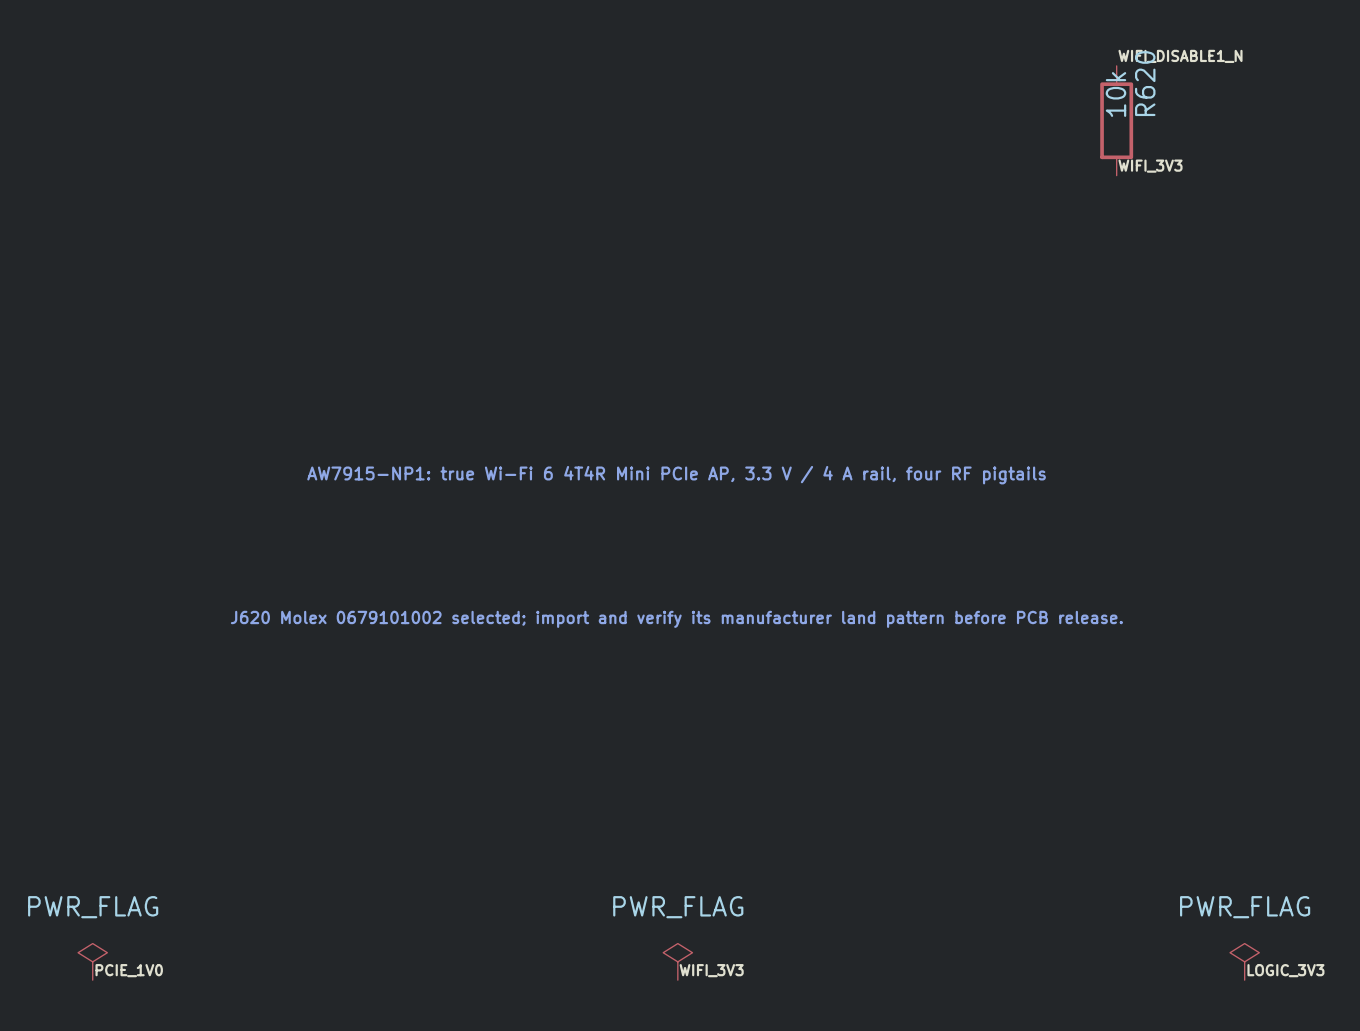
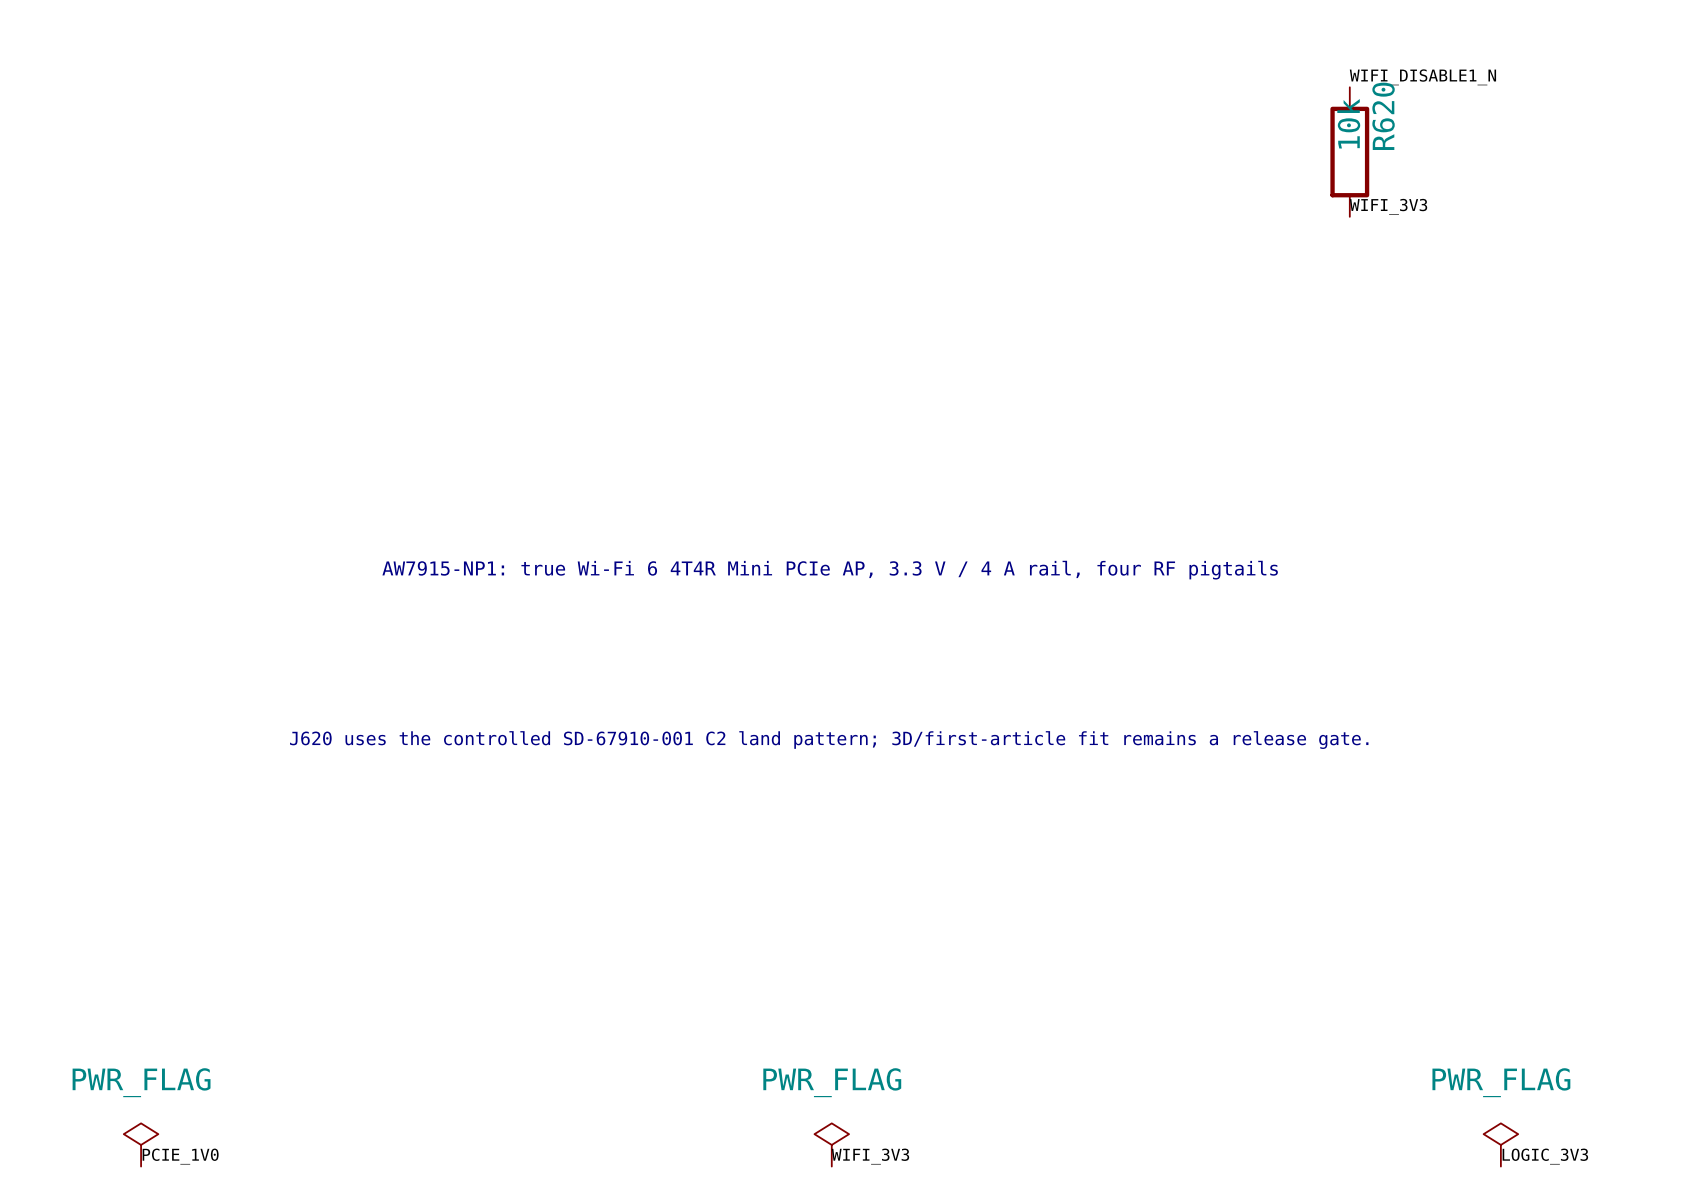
text: J620 Molex 0679101002 selected; import and verify its manufacturer land pattern before PCB release. (676, 619) -> J620 uses the controlled SD-67910-001 C2 land pattern; 3D/first-article fit remains a release gate. (829, 740)

